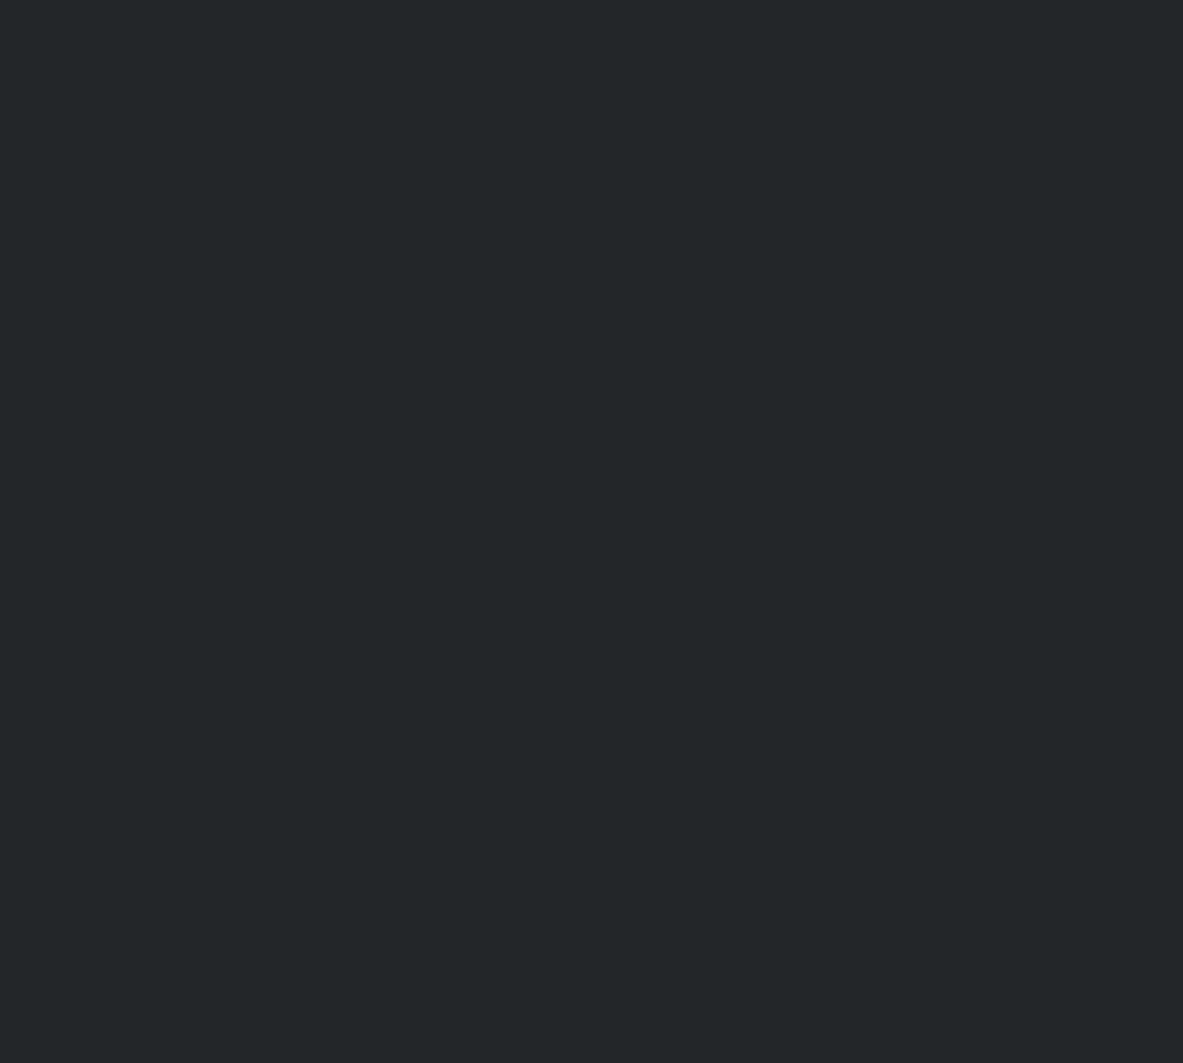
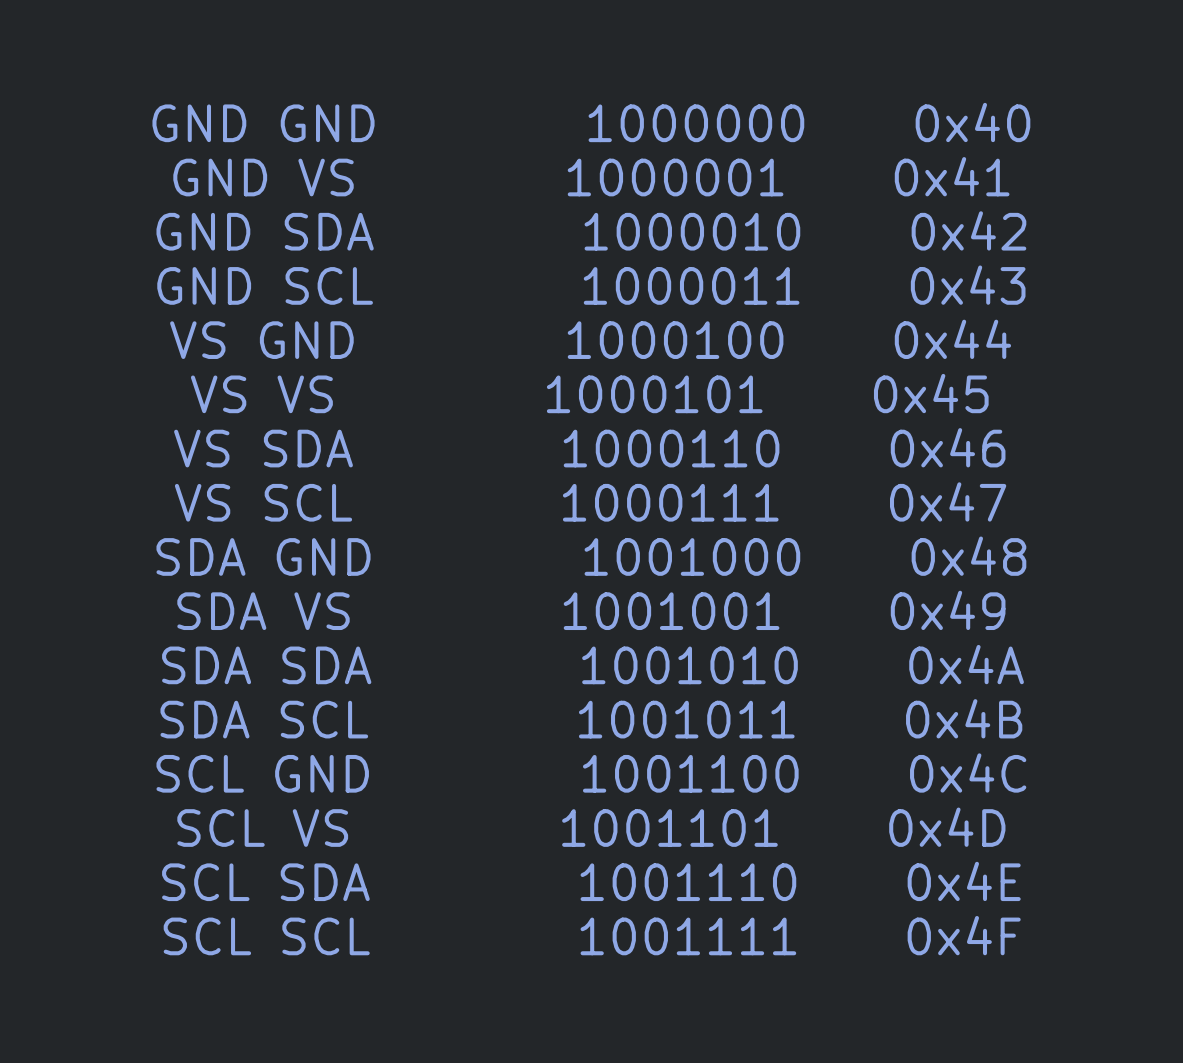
text: none -> GND GND 1000000 0x40 (591, 122)
text: none -> GND VS 1000001 0x41 (591, 176)
text: none -> GND SDA 1000010 0x42 (591, 230)
text: none -> GND SCL 1000011 0x43 (591, 285)
text: none -> VS GND 1000100 0x44 (590, 339)
text: none -> VS VS 1000101 0x45 (589, 393)
text: none -> VS SDA 1000110 0x46 (589, 447)
text: none -> VS SCL 1000111 0x47 (590, 501)
text: none -> SDA GND 1001000 0x48 (591, 556)
text: none -> SDA VS 1001001 0x49 (591, 610)
text: none -> SDA SDA 1001010 0x4A (592, 664)
text: none -> SDA SCL 1001011 0x4B (591, 718)
text: none -> SCL GND 1001100 0x4C (591, 773)
text: none -> SCL VS 1001101 0x4D (591, 827)
text: none -> SCL SDA 1001110 0x4E (591, 881)
text: none -> SCL SCL 1001111 0x4F (592, 935)

